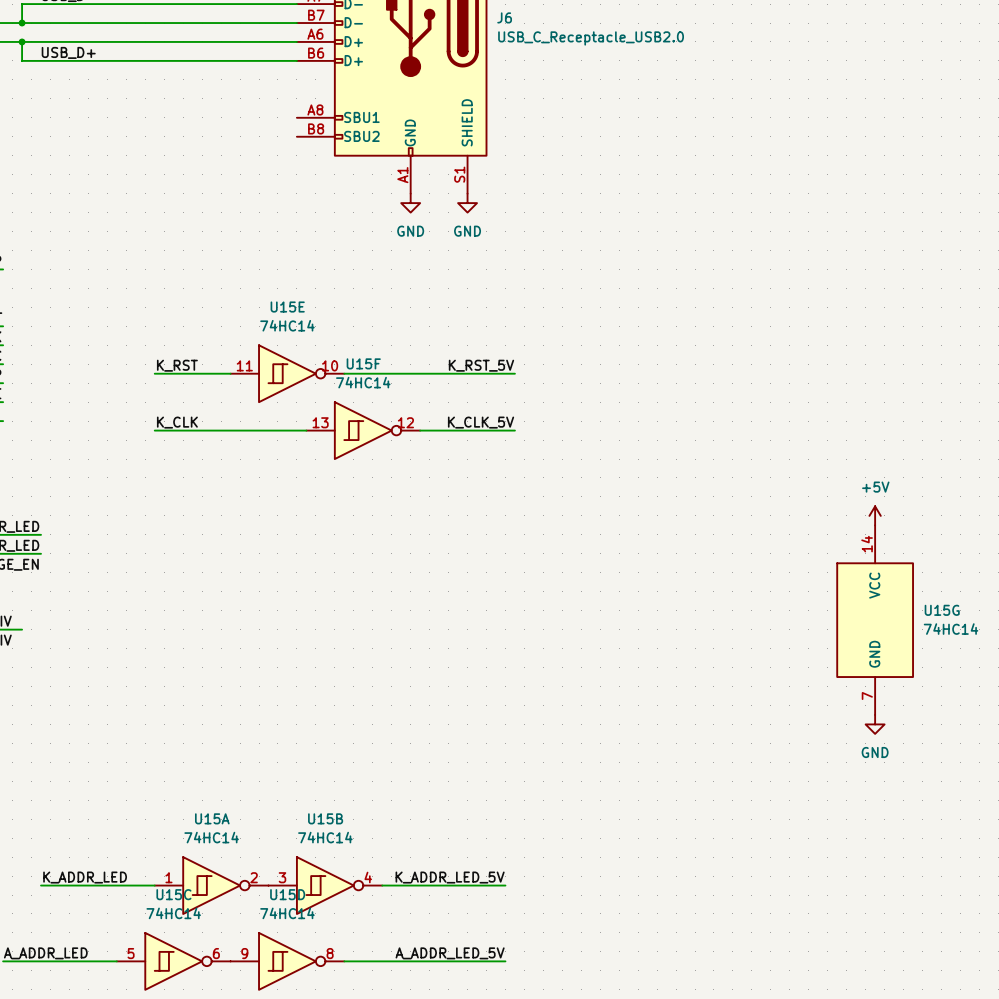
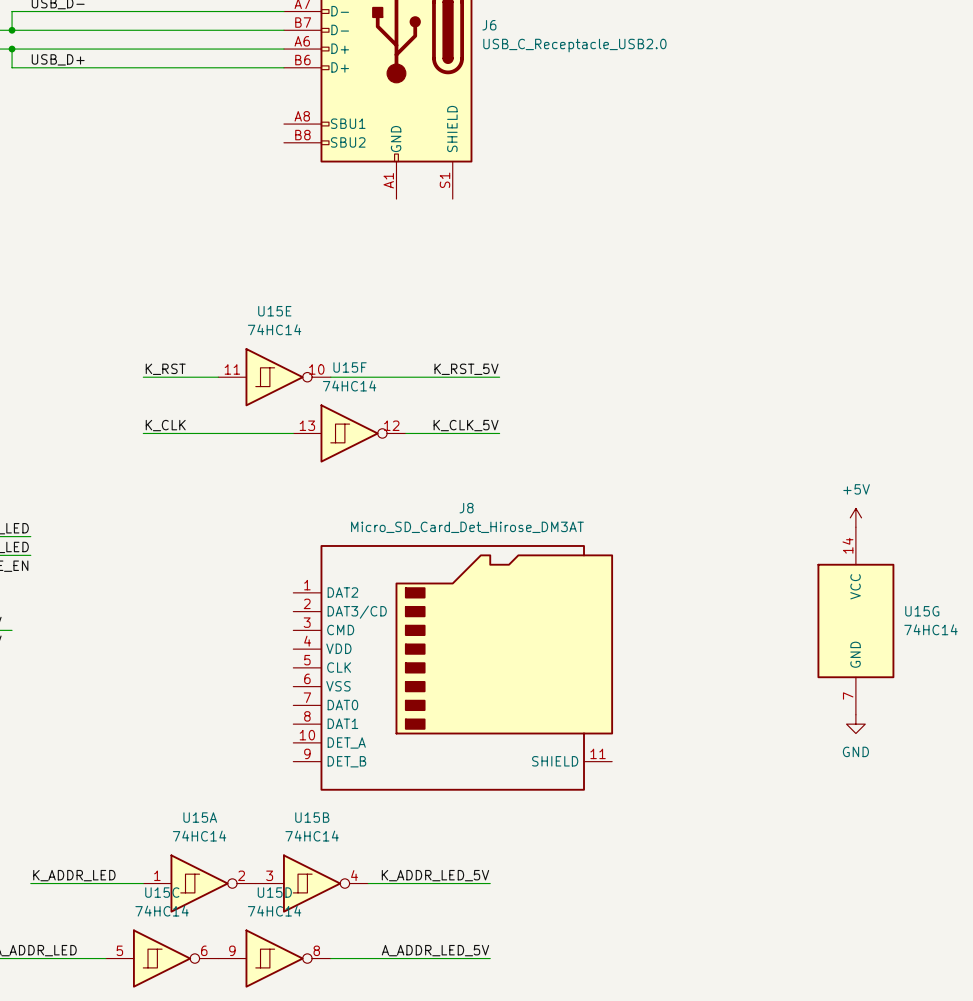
power symbol: GND (410, 203) -> none
power symbol: GND (467, 203) -> none
J8: none -> Micro_SD_Card_Det_Hirose_DM3AT (453, 667)

